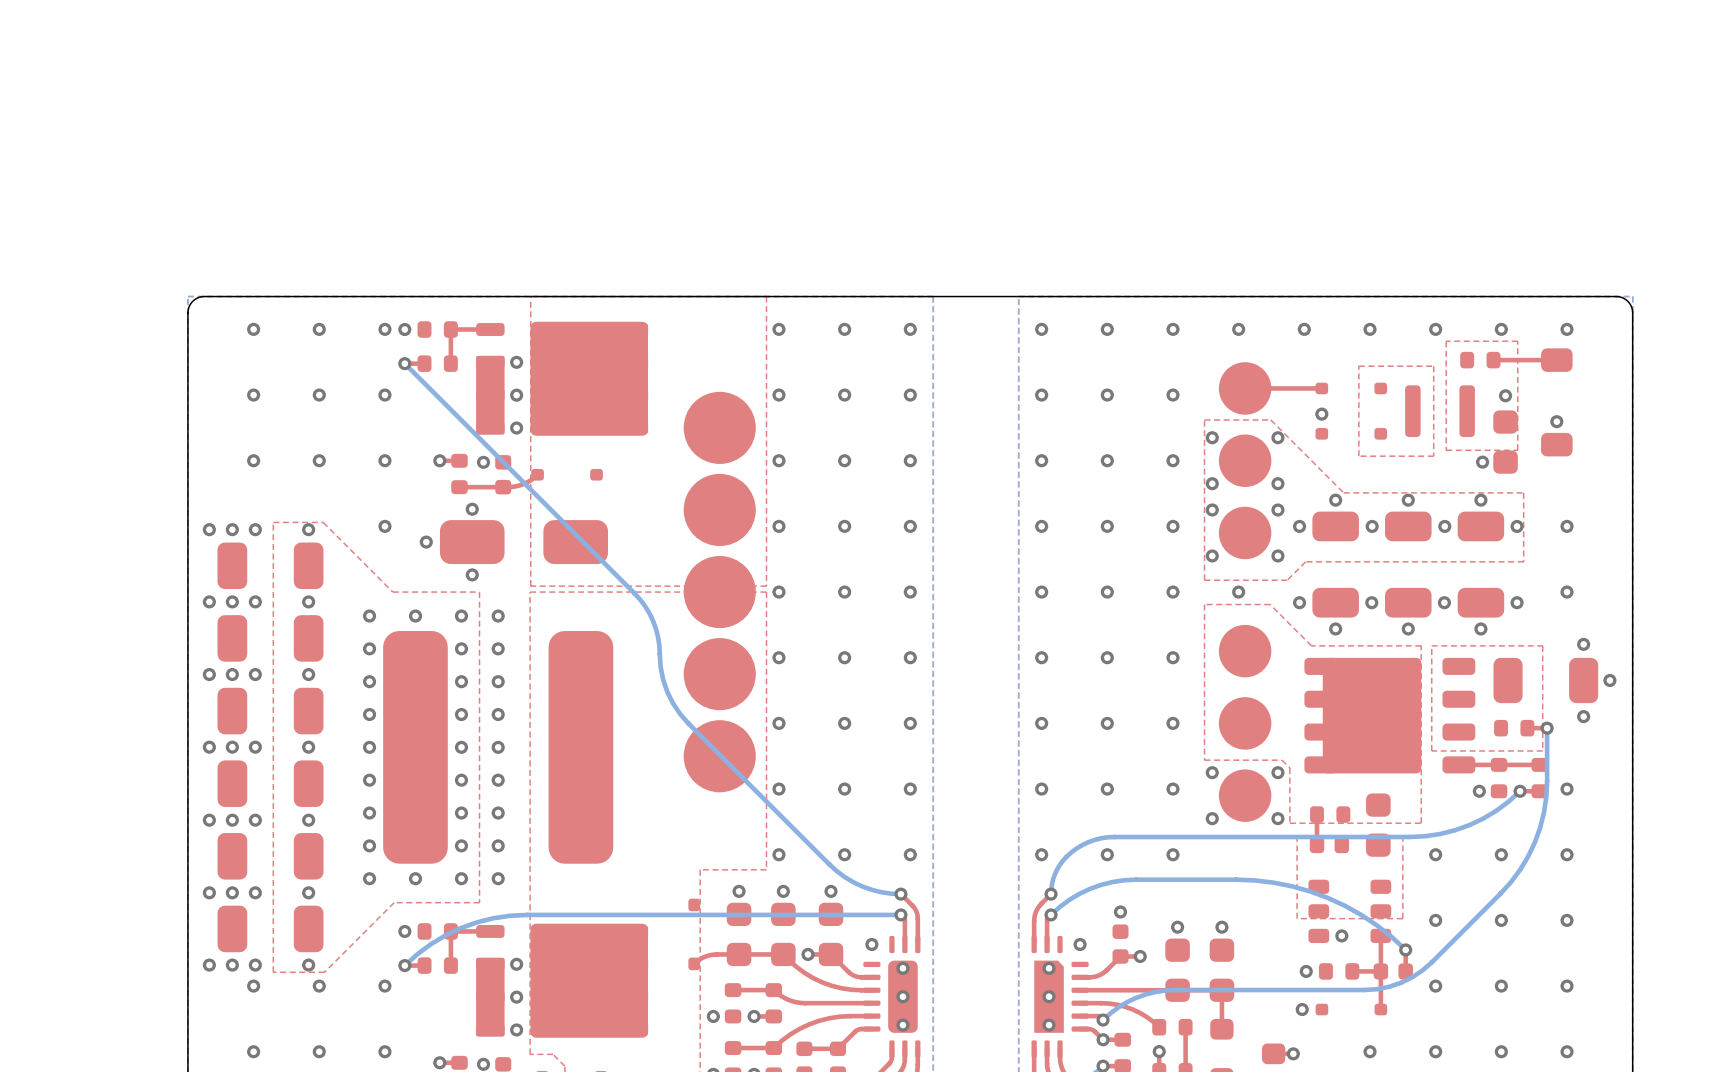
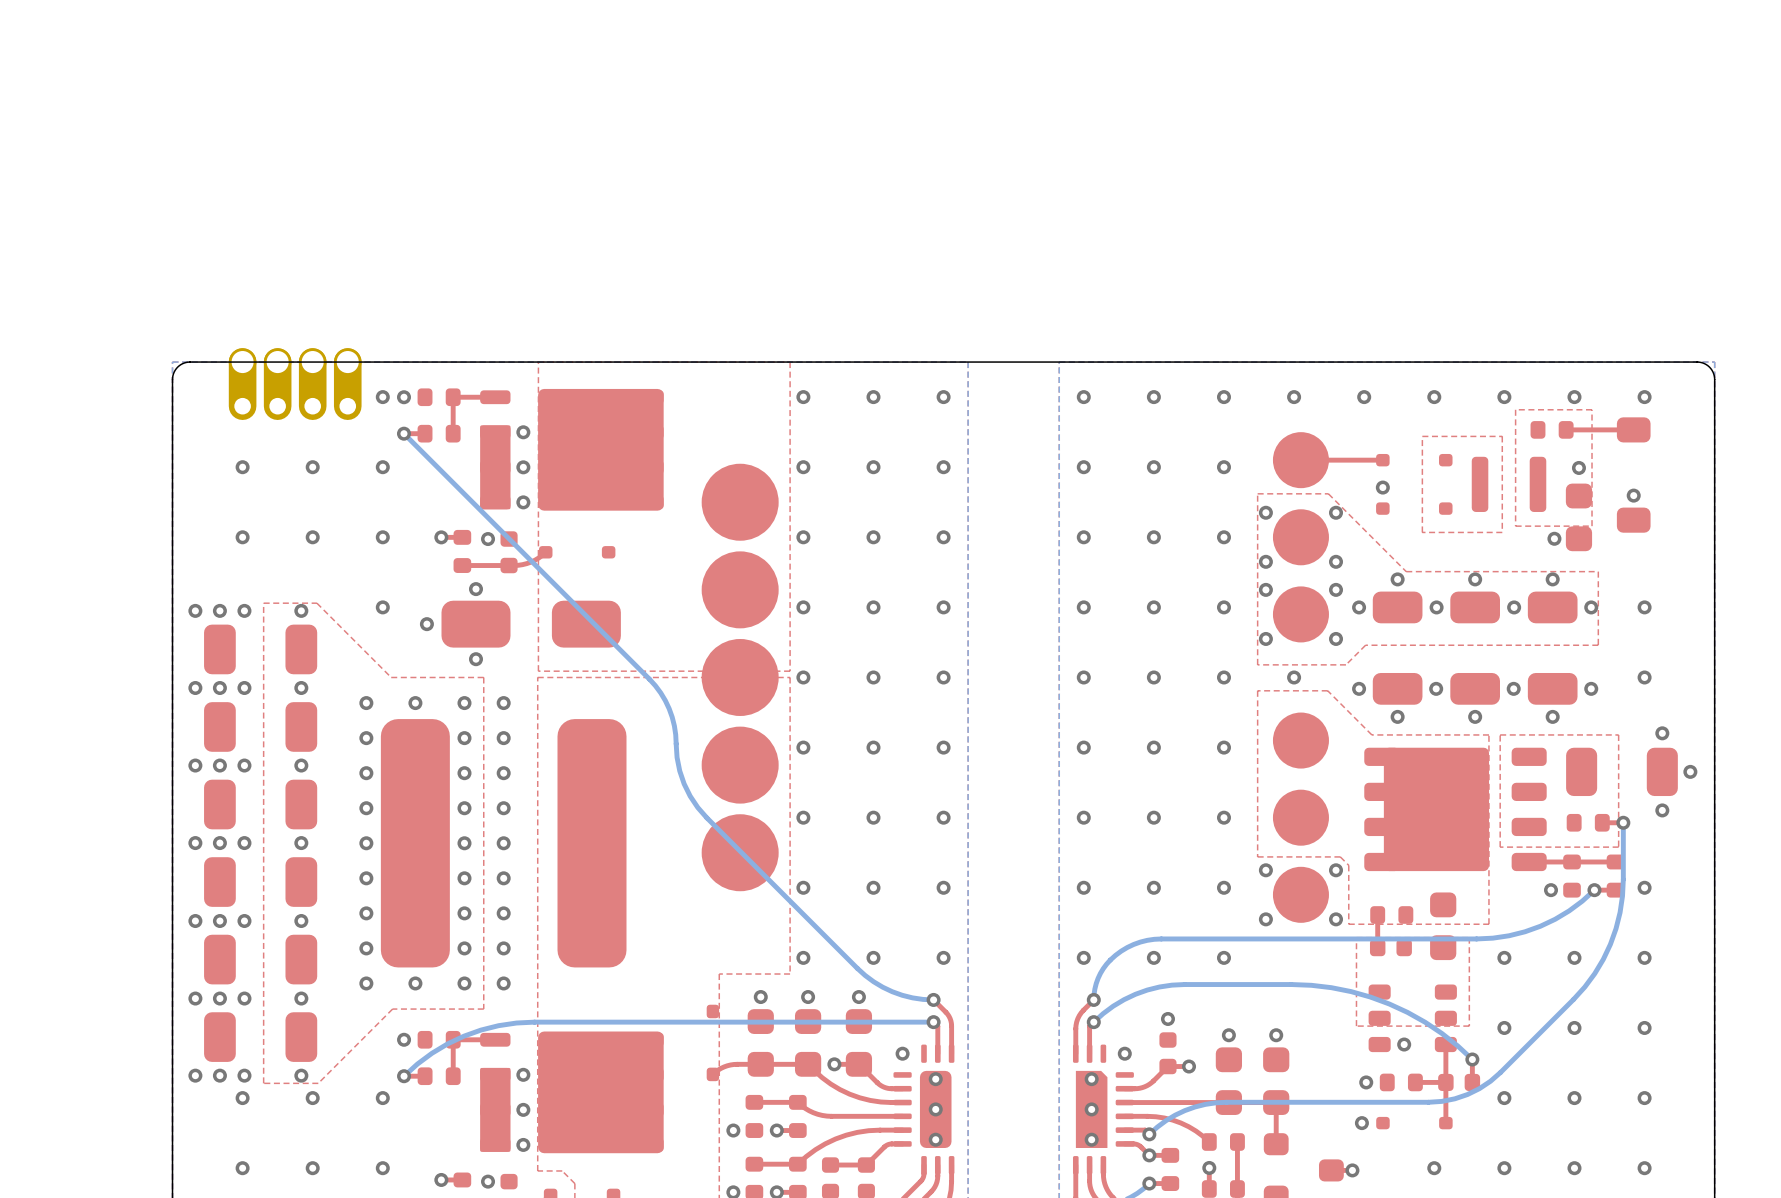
part: none -> (242, 384)
part: none -> (277, 384)
part: none -> (312, 384)
part: none -> (347, 384)
via: (253, 329) -> none
via: (319, 329) -> none

